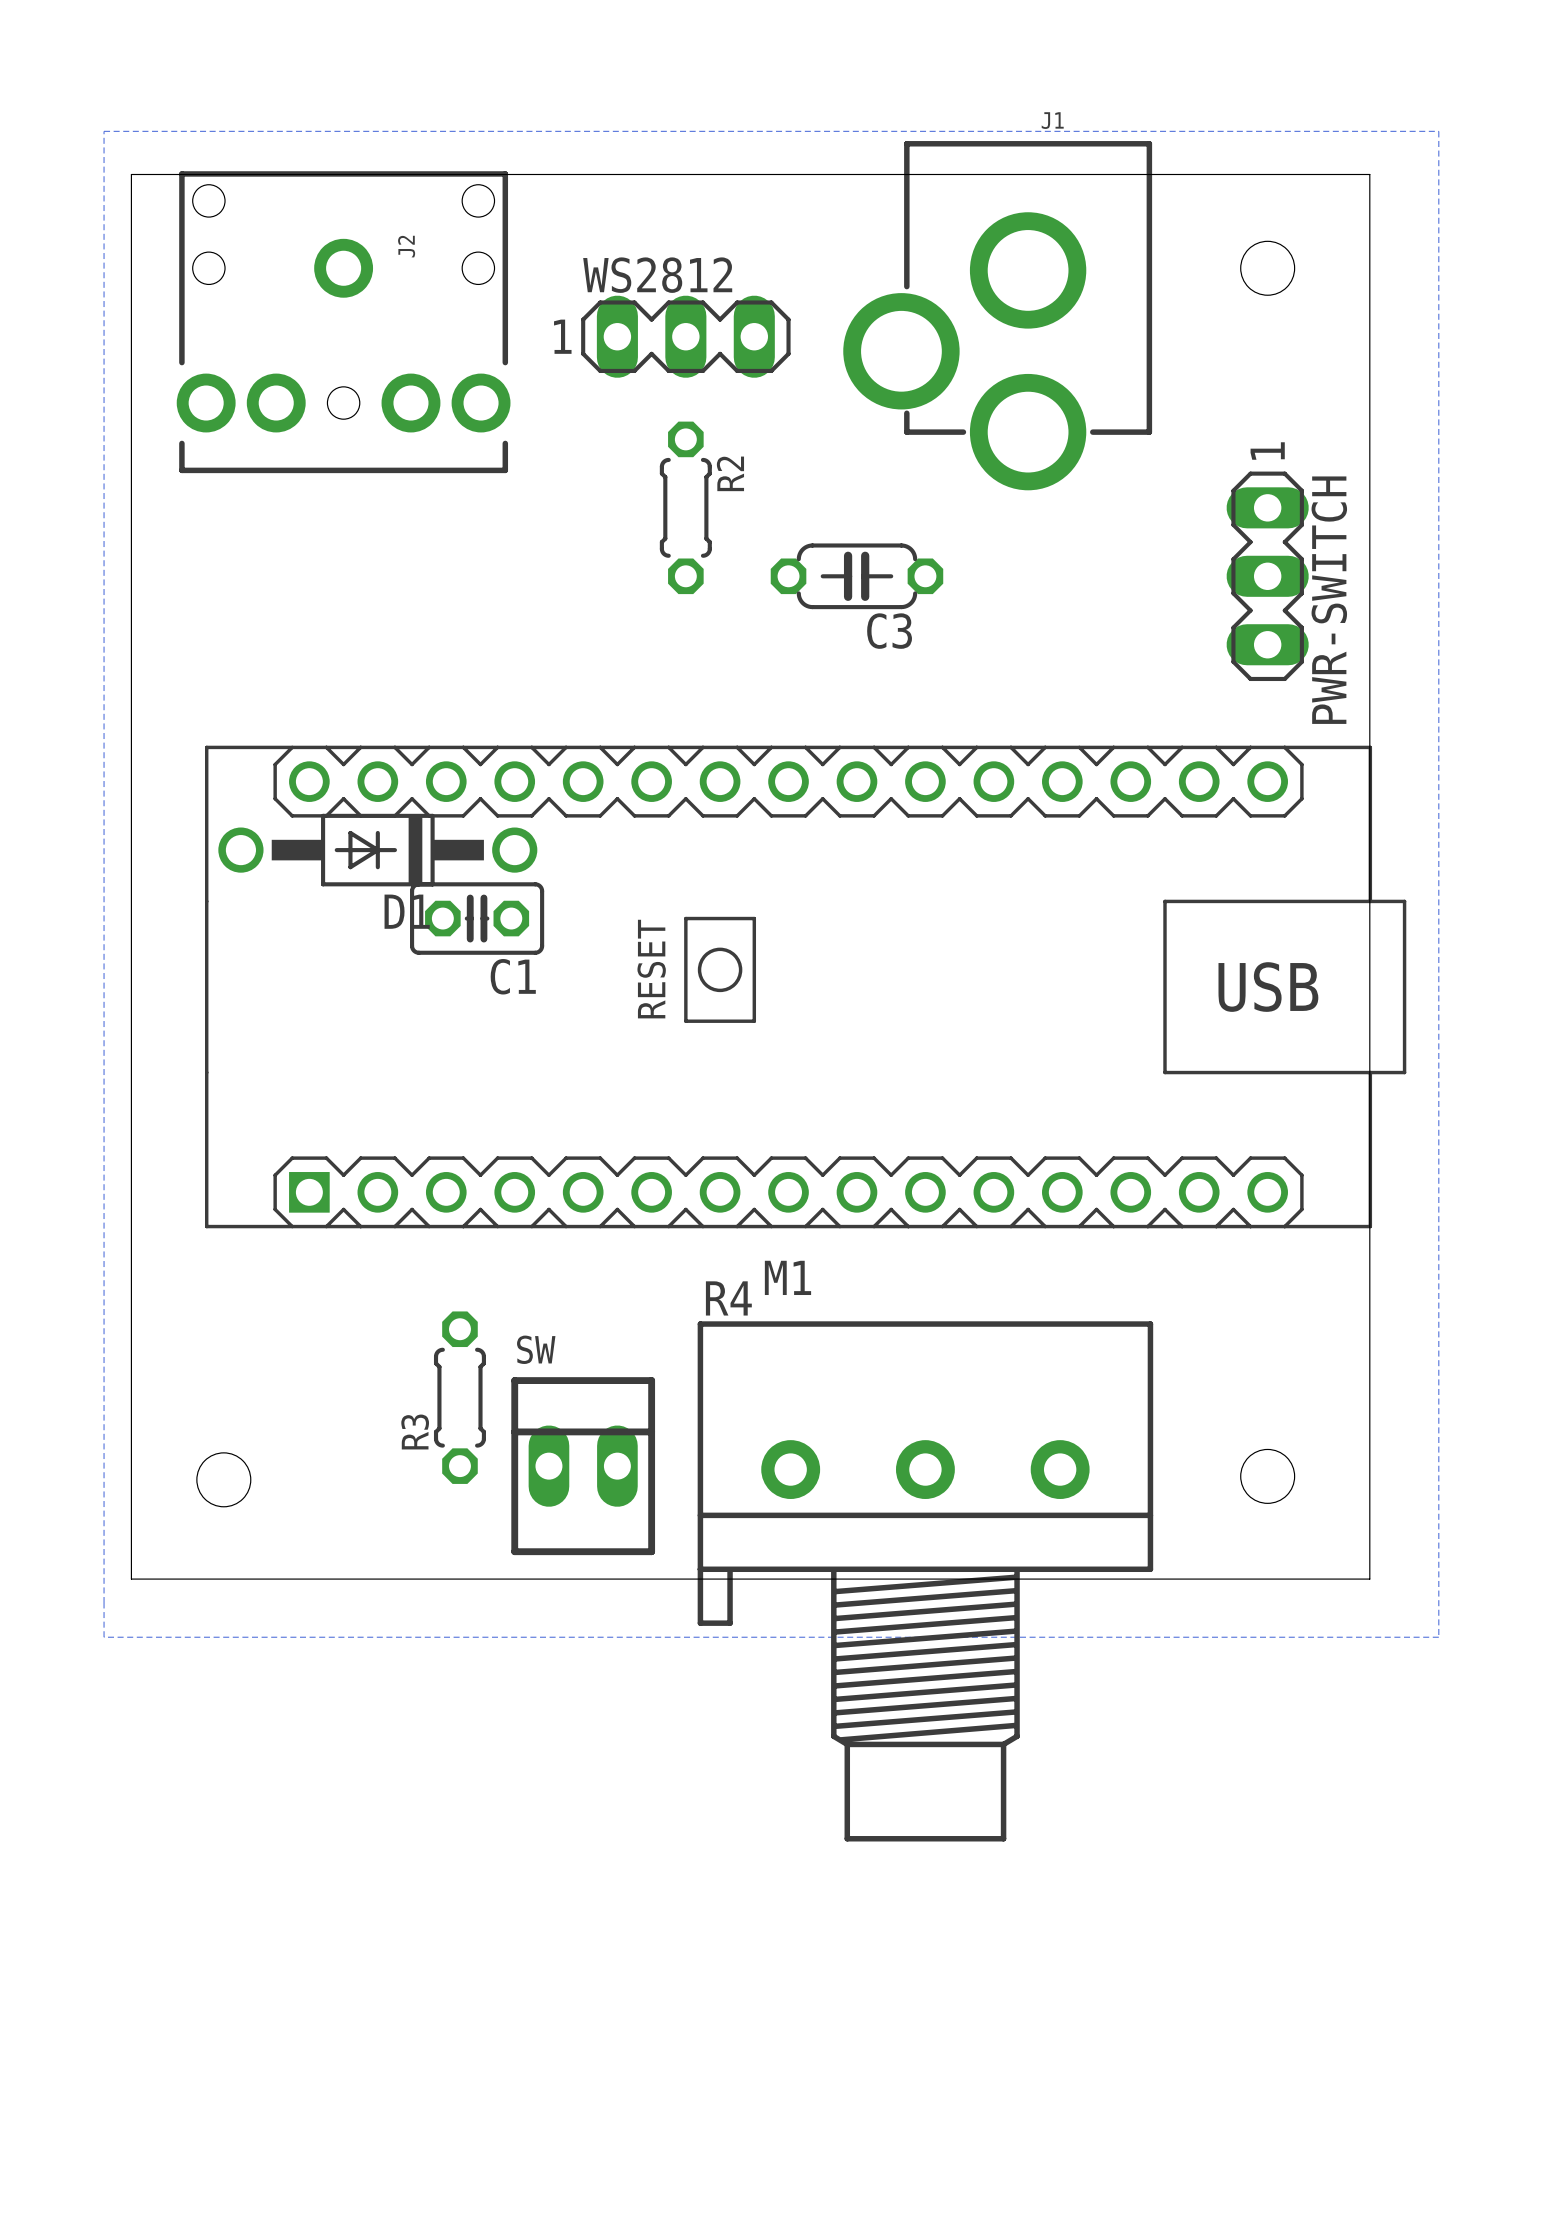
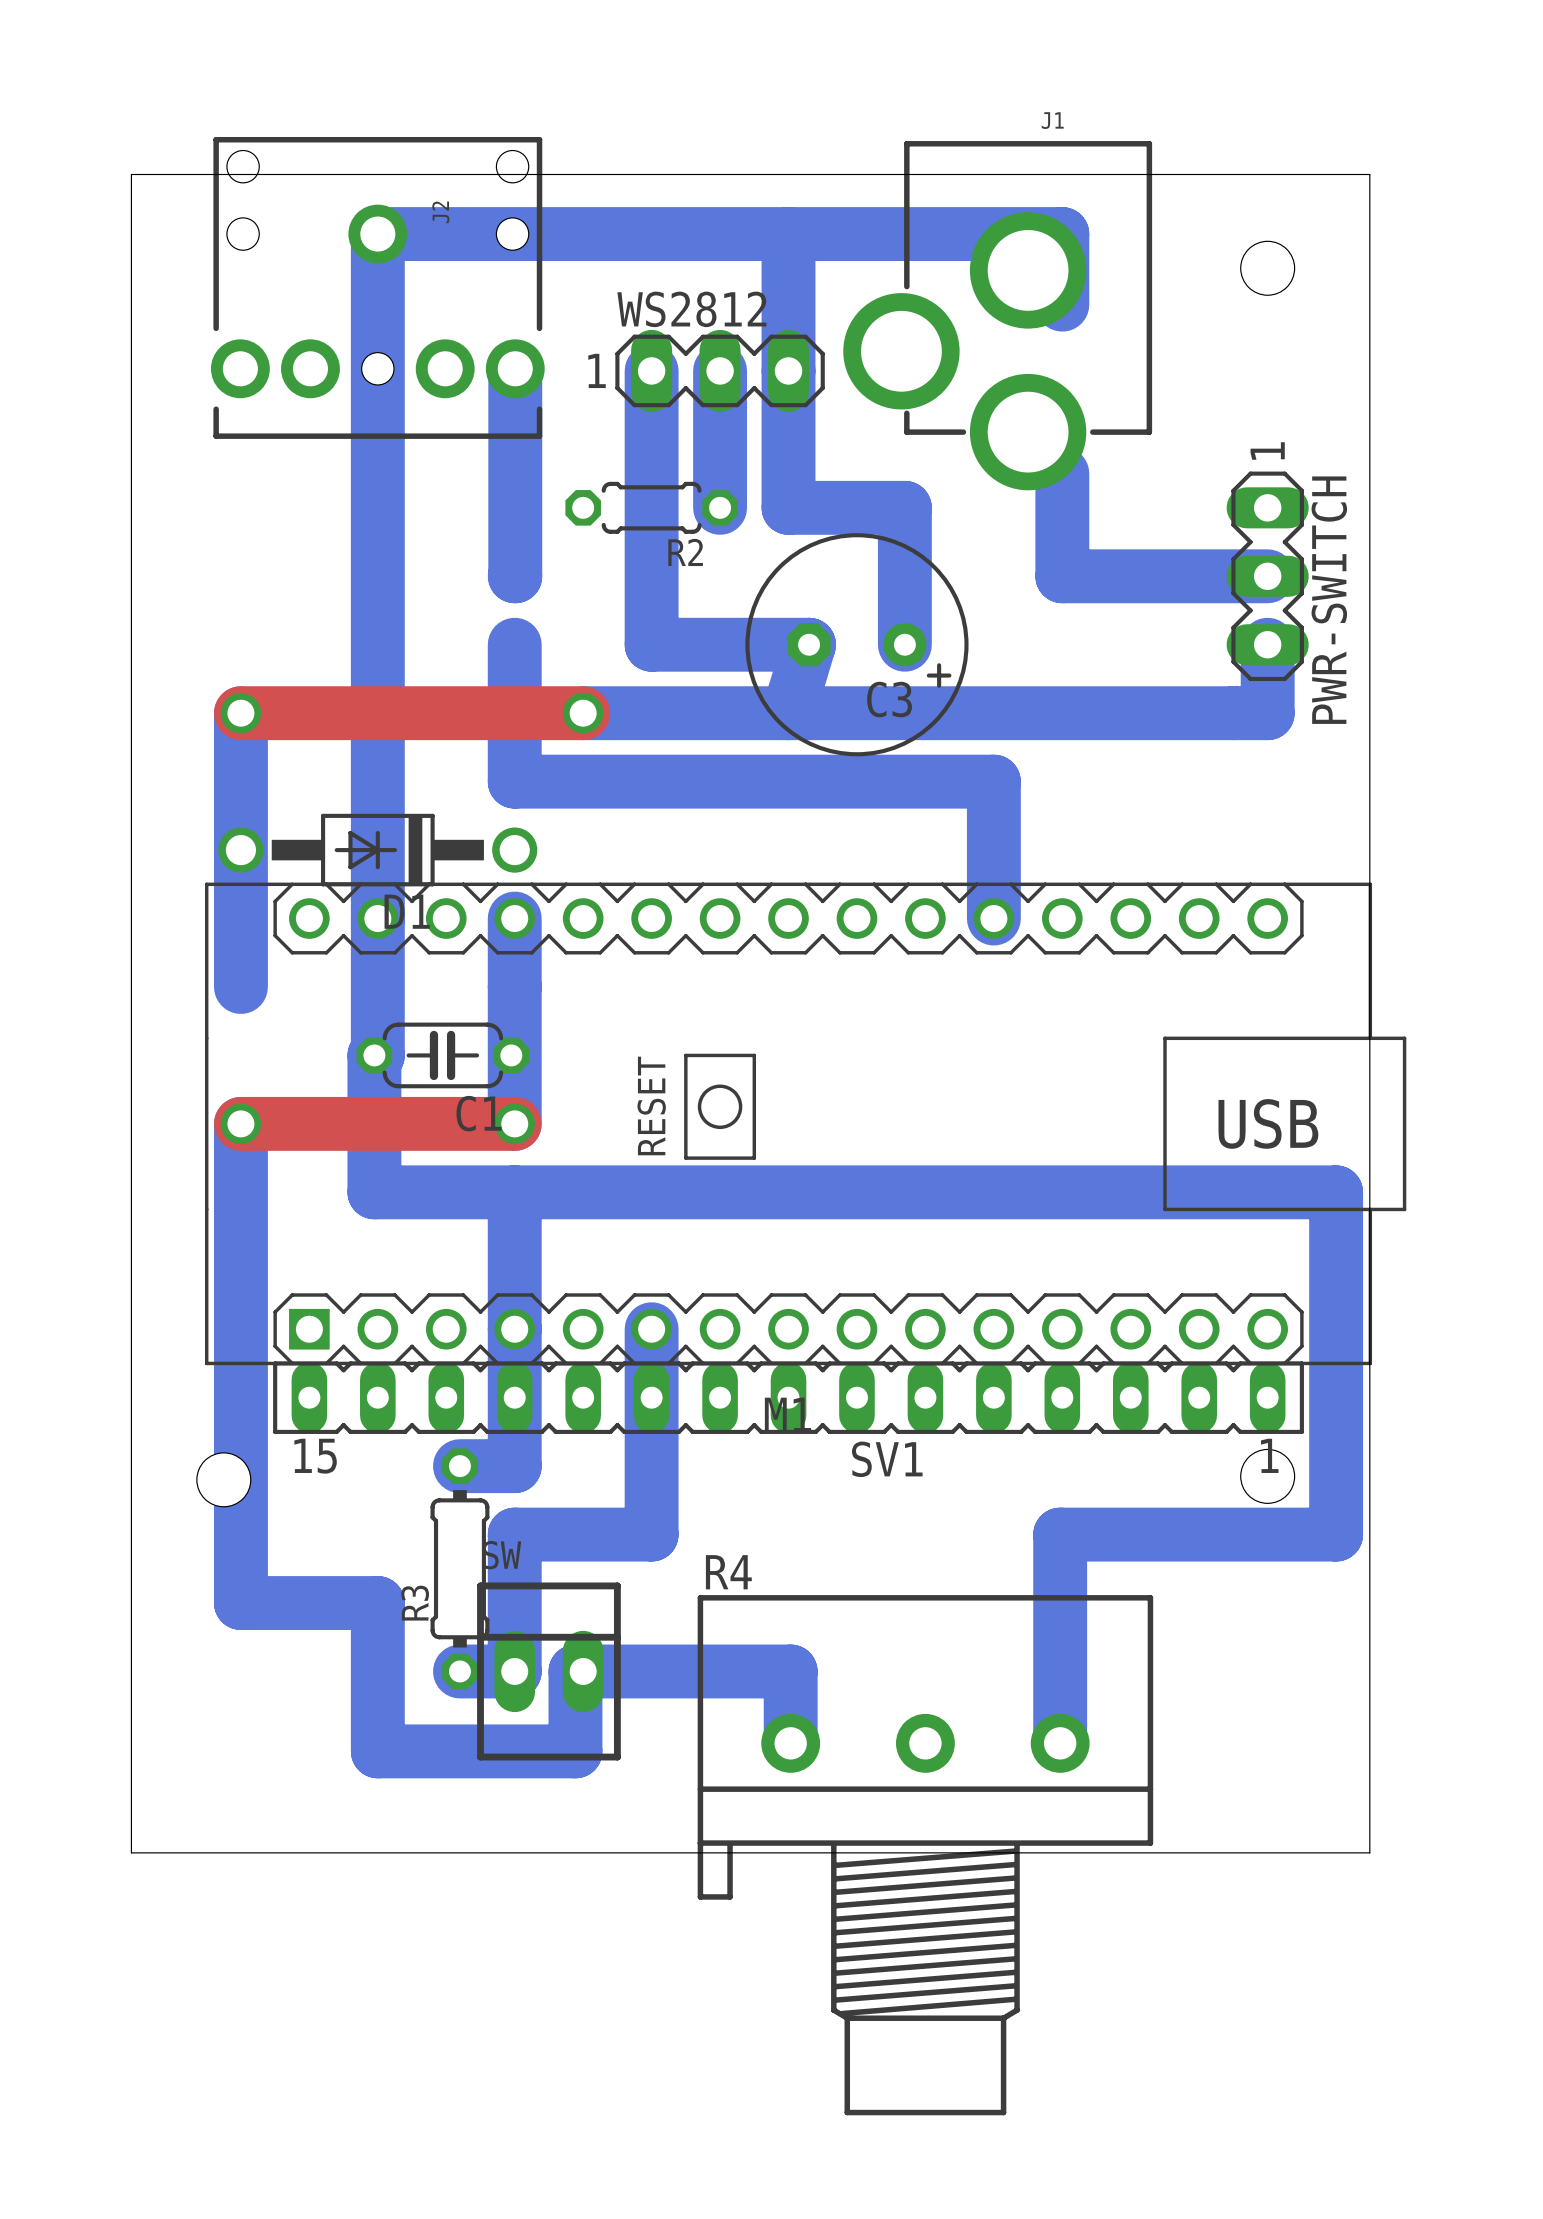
bottom zone outline: (104, 131) (104, 1637) (1438, 1637) (1438, 131) (104, 131) -> none
bottom track: none -> (788, 234) (788, 507) (904, 507) (904, 644)
bottom track: none -> (1062, 304) (1062, 234) (377, 234) (377, 1055) (374, 1055) (374, 1192) (1336, 1192) (1336, 1534) (1060, 1534) (1060, 1743)
J2 position: (343, 322) -> (377, 287)
WS2812 position: (685, 336) -> (720, 370)
bottom track: none -> (515, 368) (515, 576)
bottom track: none -> (651, 370) (651, 644) (809, 644) (788, 713)
bottom track: none -> (720, 370) (720, 507)
bottom track: none -> (1062, 473) (1062, 576) (1267, 576)
R2 rotation: 0° (685, 507) -> 90° clockwise (651, 507)
C3 footprint: [770, 543, 944, 610] -> [745, 533, 969, 757]
bottom track: none -> (514, 644) (514, 781) (993, 781) (993, 918)
bottom track: none -> (1267, 644) (1267, 713) (583, 713)
bottom track: none -> (240, 713) (240, 986)
top track: none -> (240, 713) (583, 713)
via: none -> (240, 713)
via: none -> (583, 713)
C1 footprint: [410, 882, 545, 955] -> [356, 1022, 530, 1089]
bottom track: none -> (514, 918) (514, 1123)
M1 position: (805, 986) -> (805, 1123)
bottom track: none -> (240, 1123) (240, 1603) (377, 1603) (377, 1751) (575, 1751) (575, 1671) (790, 1671) (790, 1743)
top track: none -> (240, 1123) (514, 1123)
via: none -> (240, 1123)
via: none -> (514, 1123)
bottom track: none -> (514, 1192) (514, 1466) (459, 1466)
R3 footprint: [433, 1311, 486, 1484] -> [430, 1448, 490, 1690]
bottom track: none -> (651, 1329) (651, 1534) (514, 1534) (514, 1671) (459, 1671)
SV1: none -> (788, 1397)
SW position: (583, 1466) -> (548, 1671)
board edge: (131, 1579) (1369, 1579) -> (131, 1579) (131, 1852) (1369, 1852) (1369, 1579)
R4 position: (925, 1581) -> (925, 1855)

